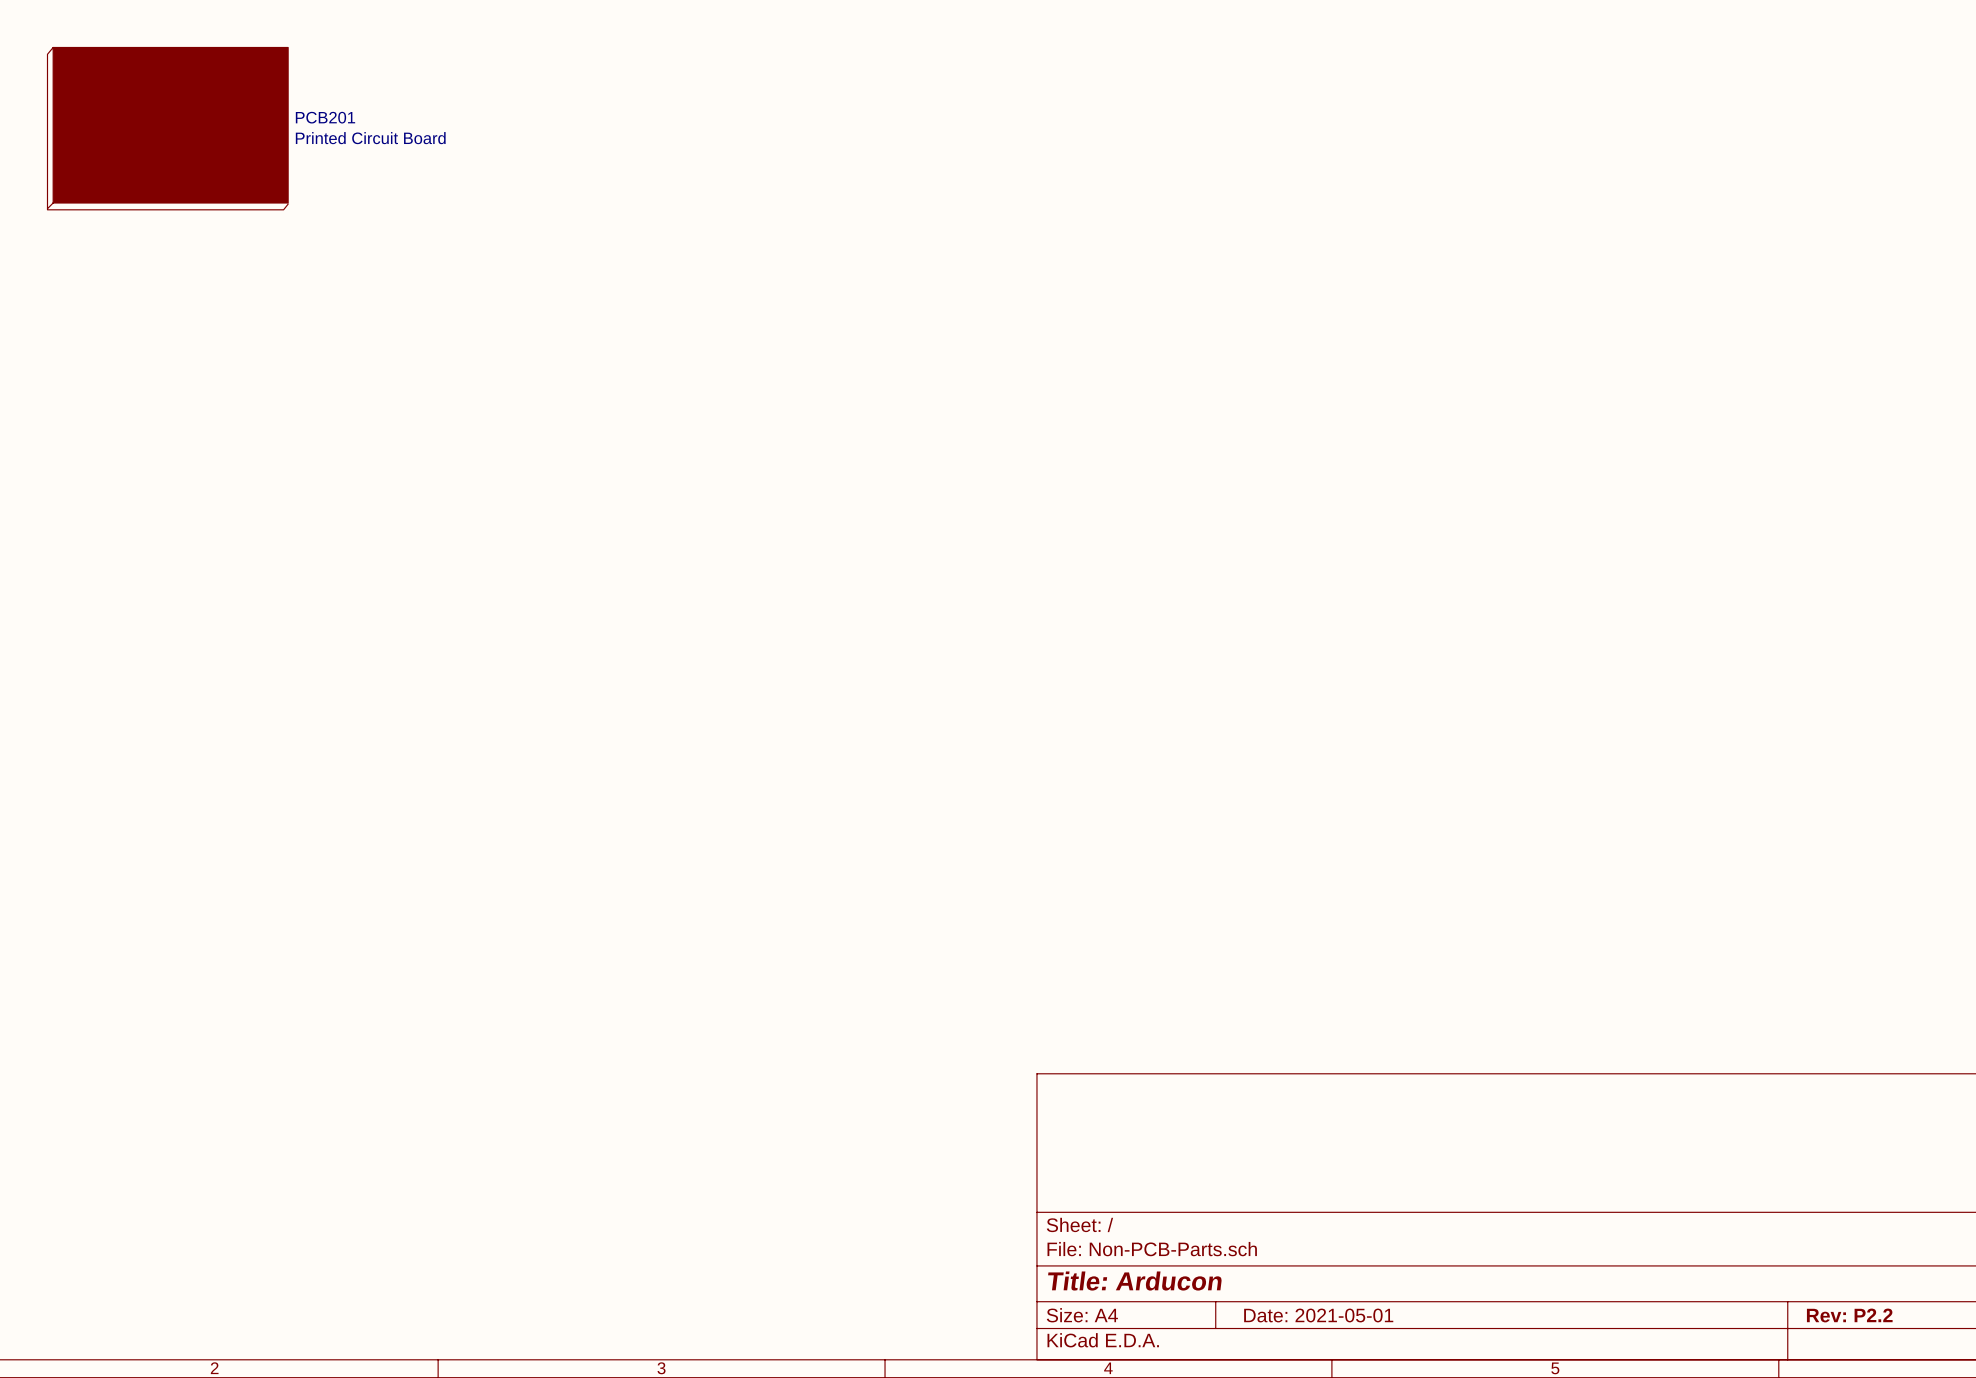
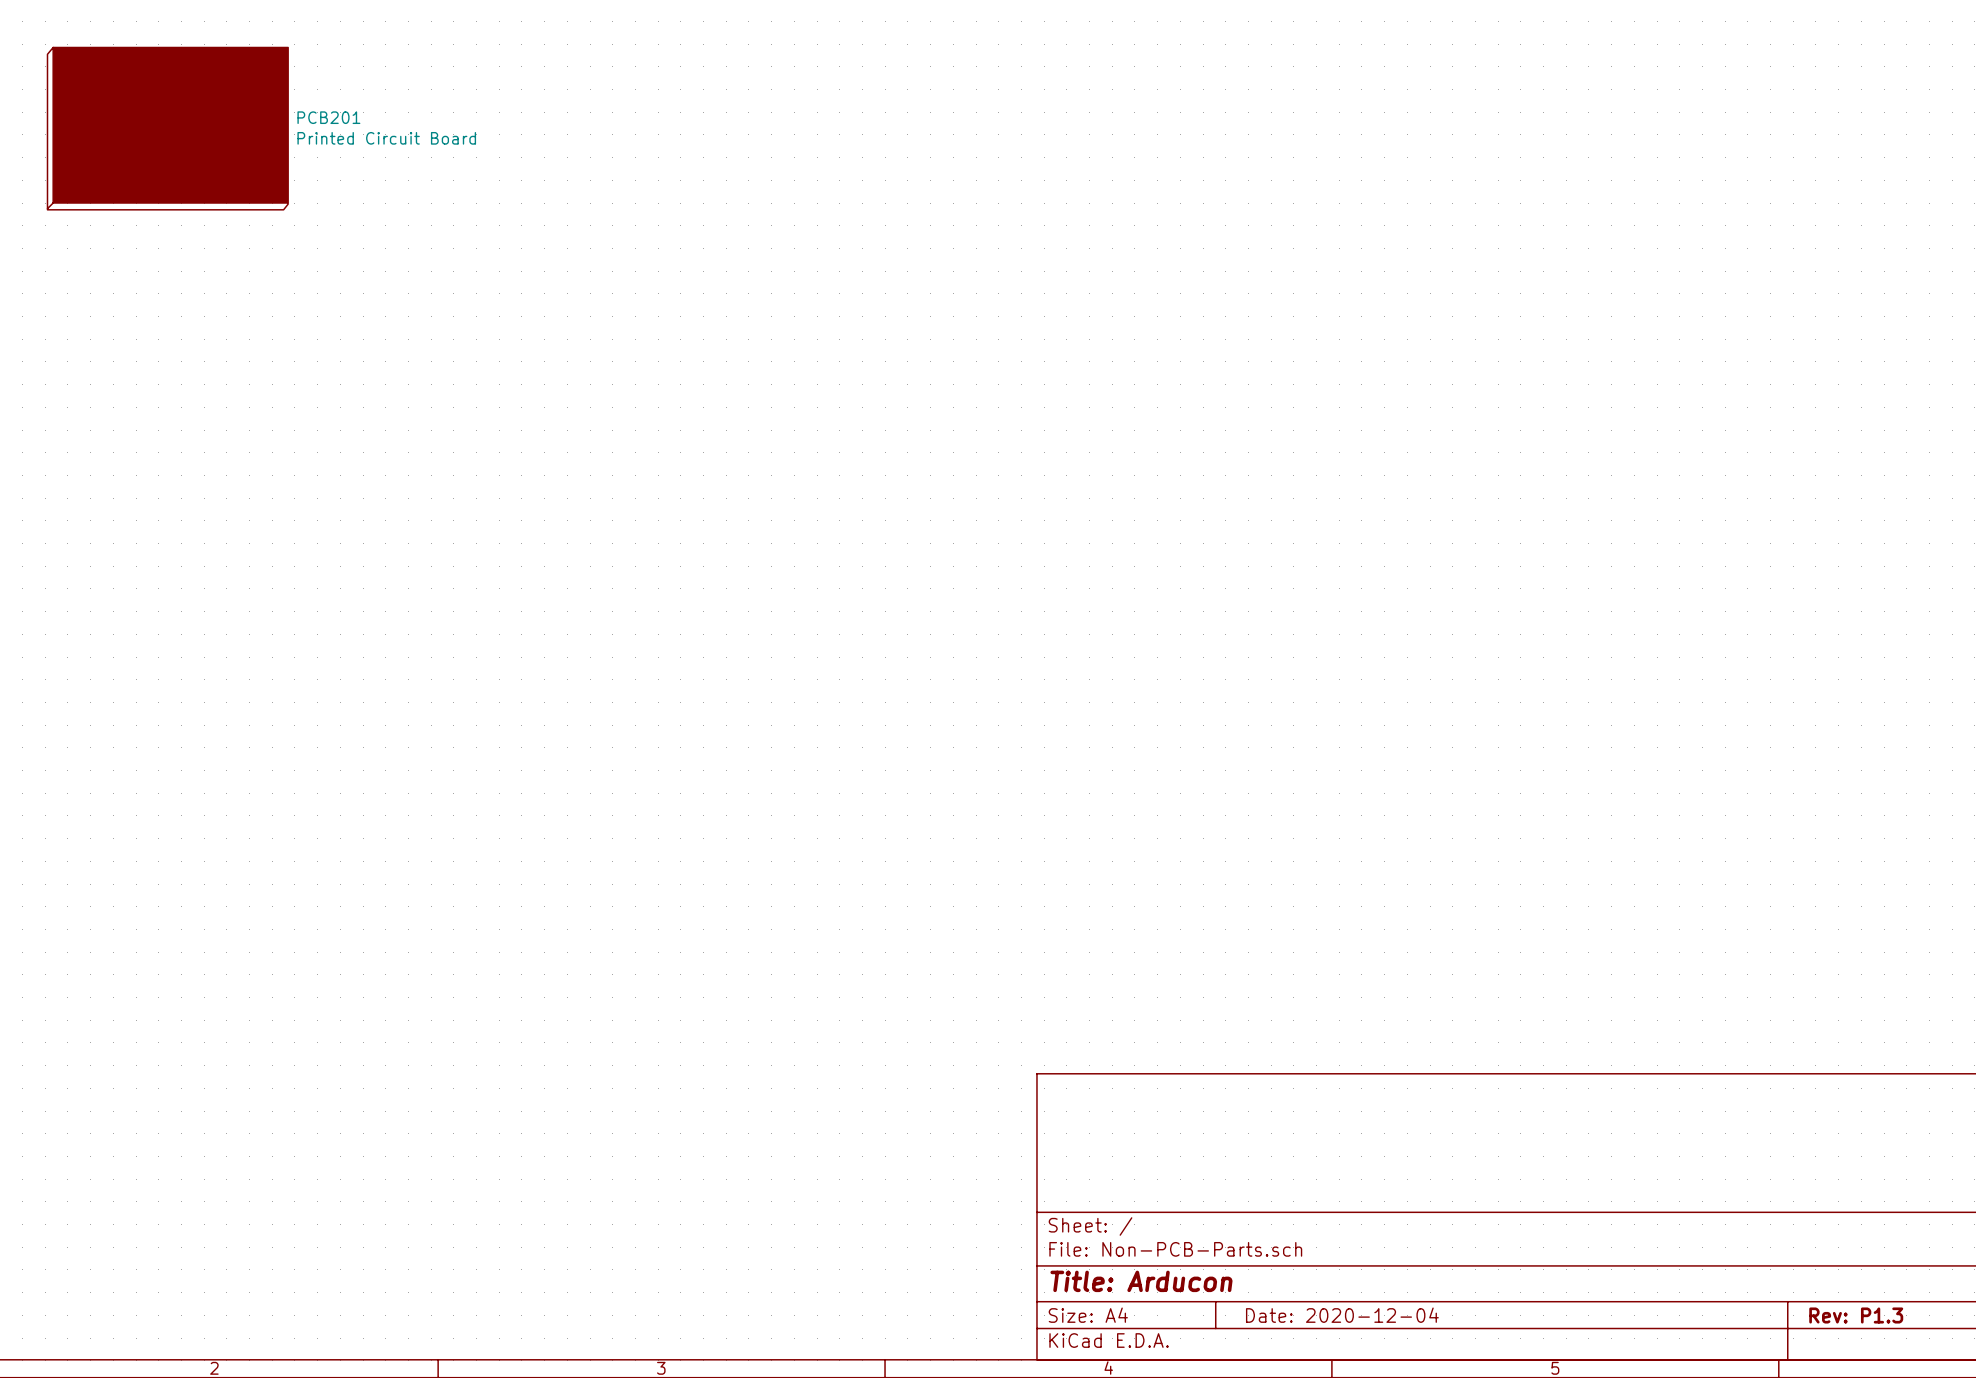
title block: Date: 2021-05-01 (1318, 1315) -> Date: 2020-12-04 (1342, 1315)
title block: Rev: P2.2 (1849, 1315) -> Rev: P1.3 (1856, 1315)

